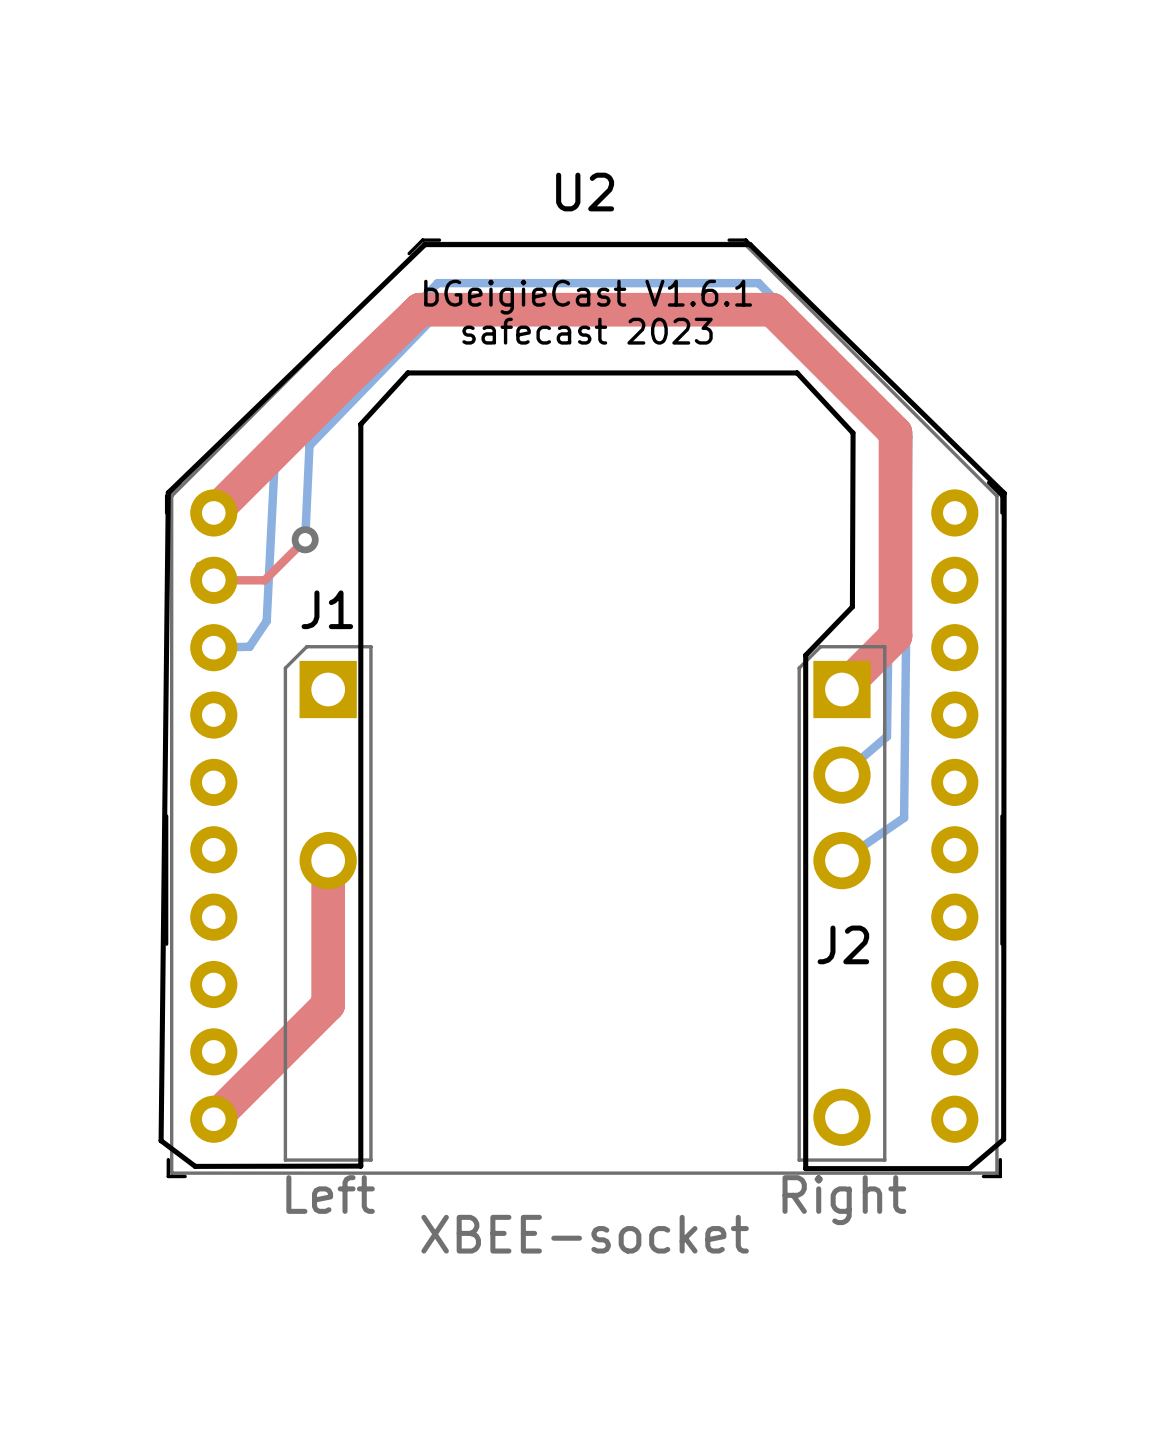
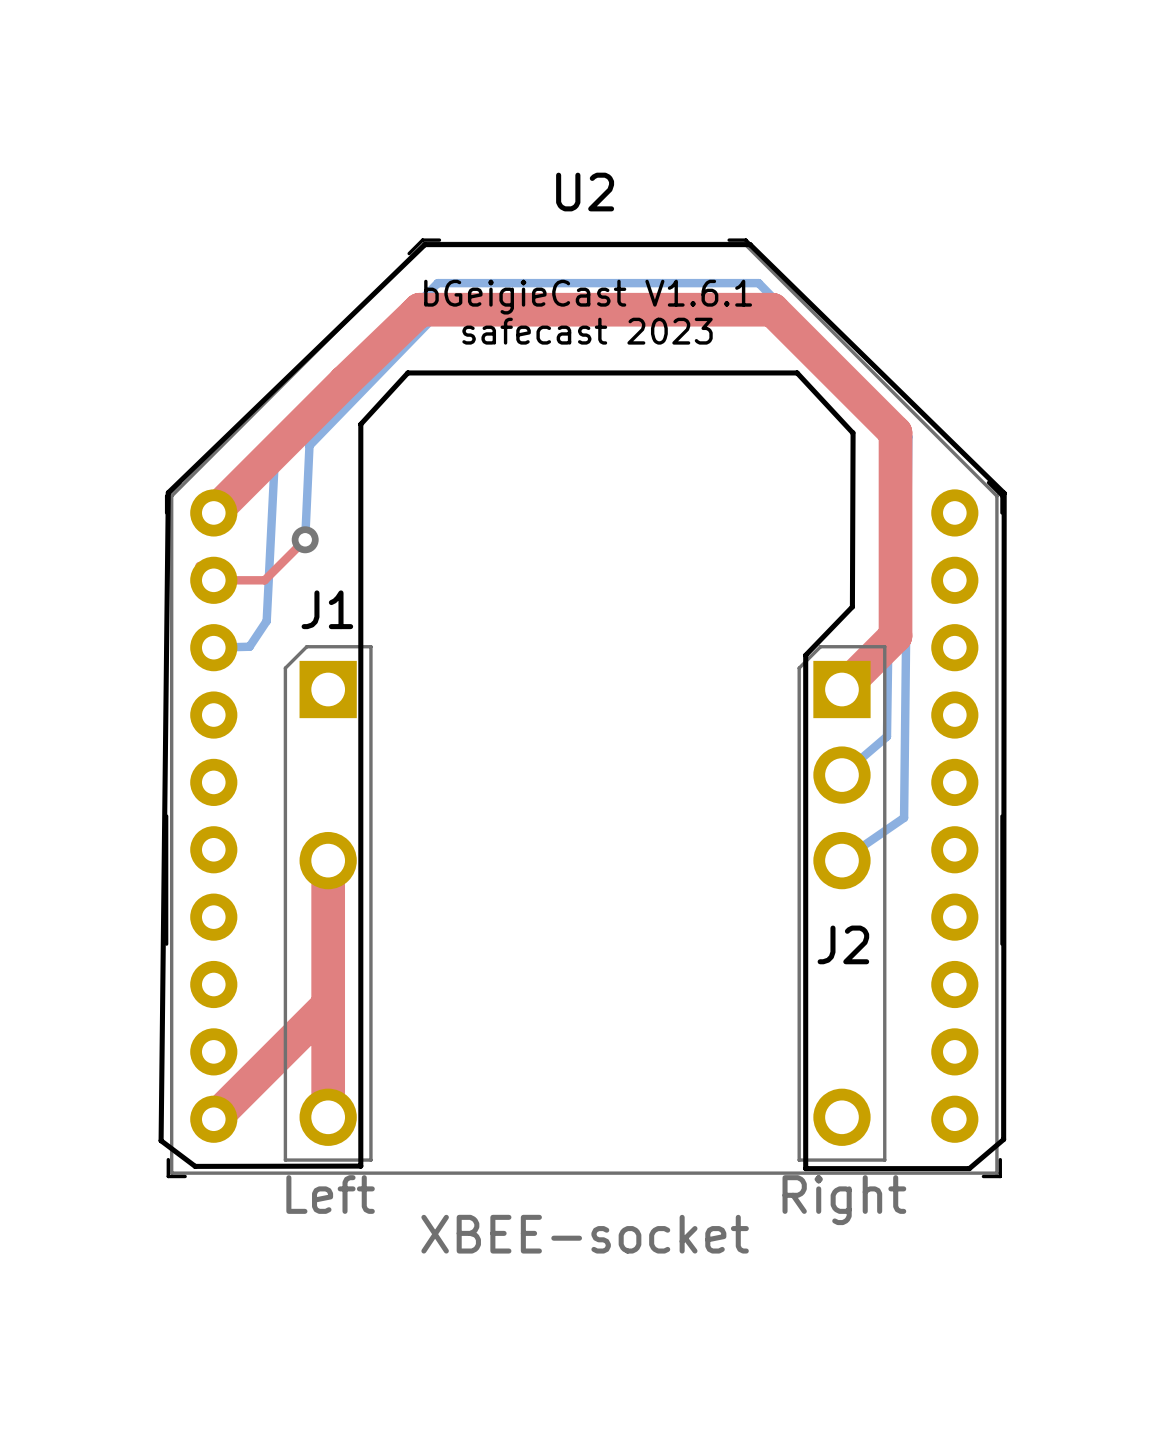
J1 footprint: [283, 645, 373, 1162] -> [283, 645, 373, 1162]
top track: none -> (328, 1004) (328, 1117)

